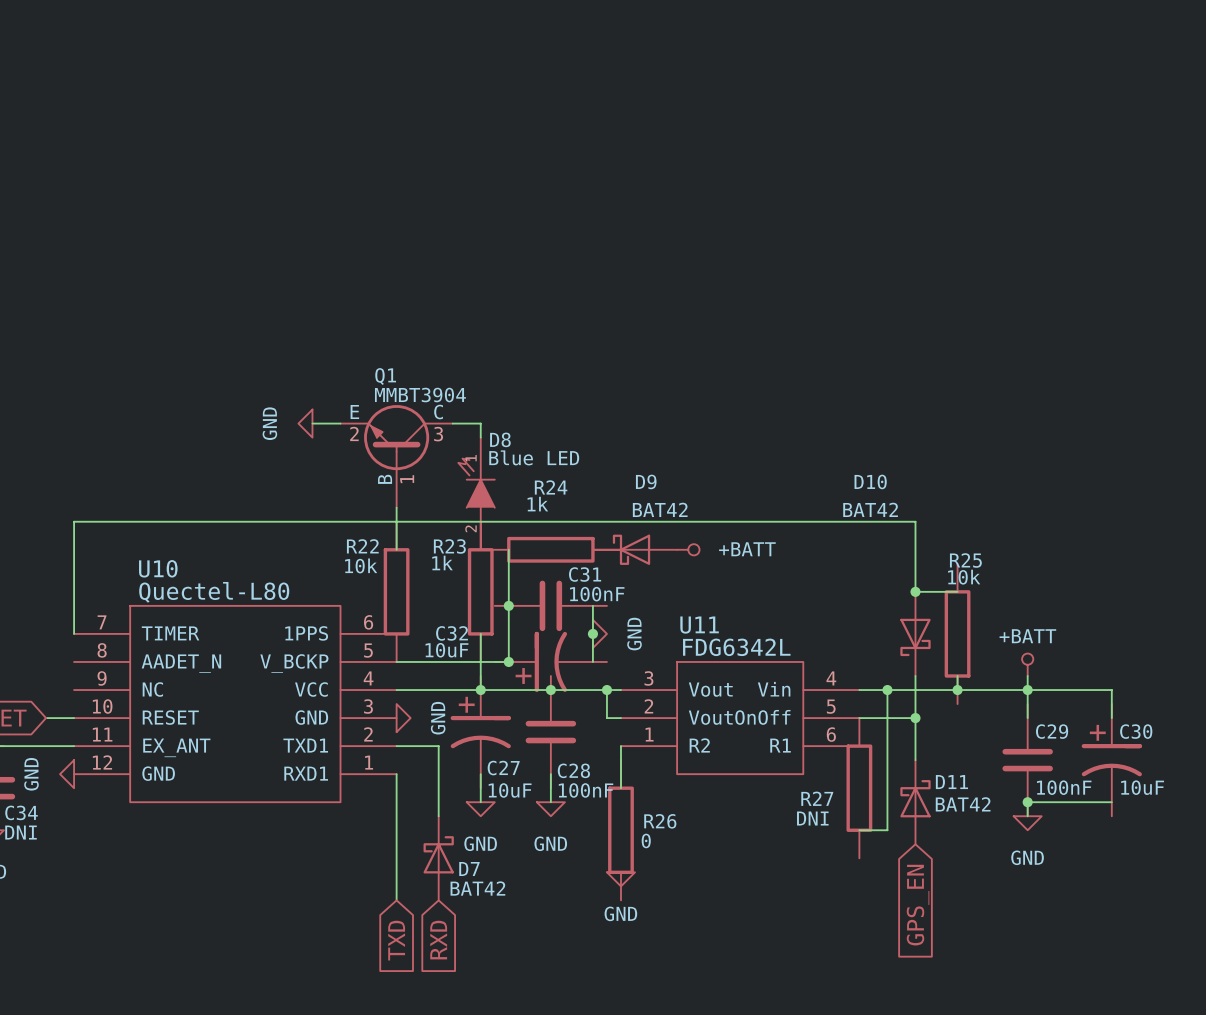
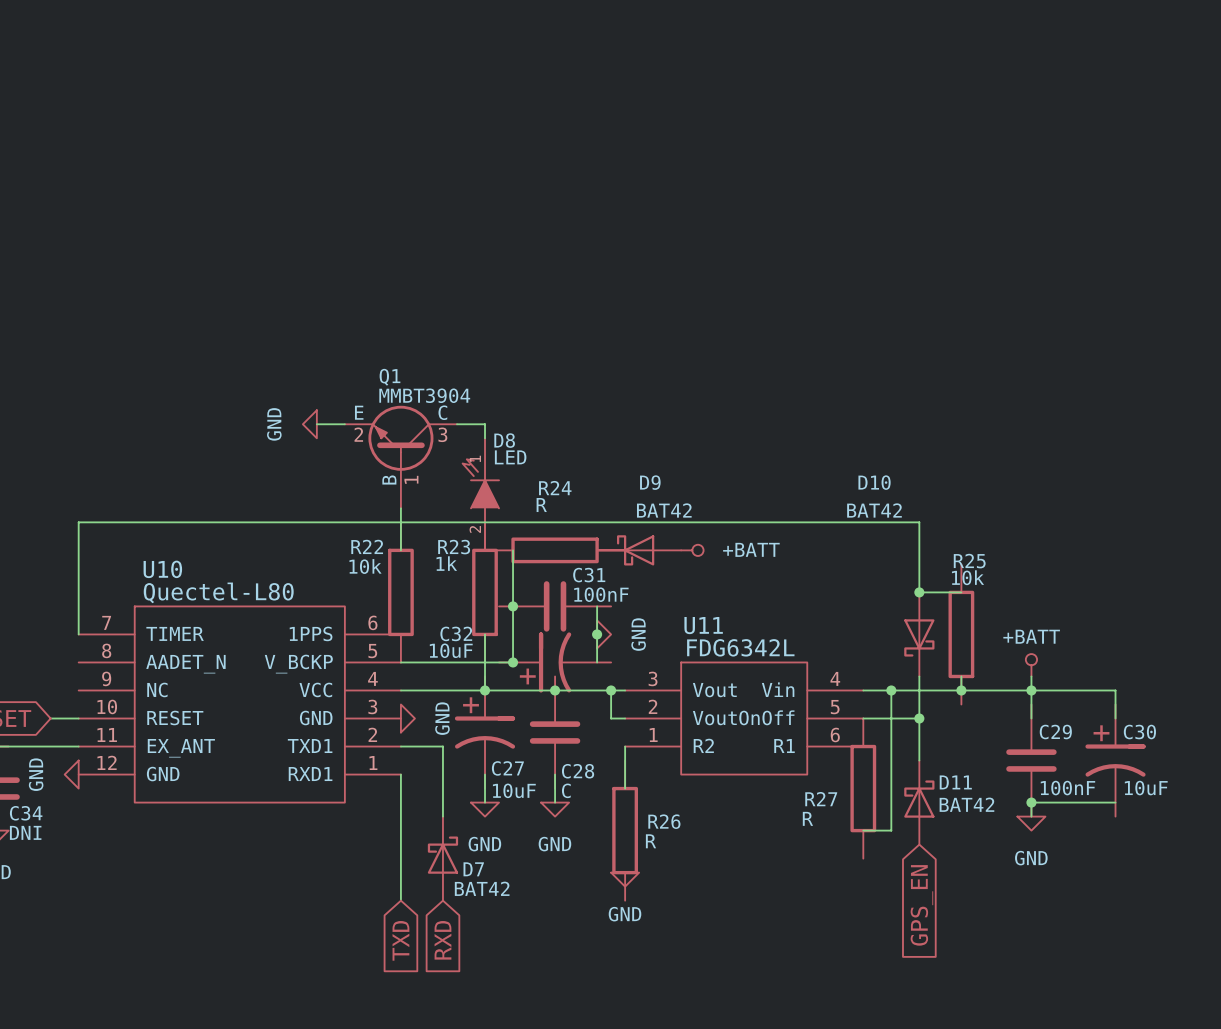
D8 value: Blue LED (534, 457) -> LED (510, 457)
R24 value: 1k (537, 504) -> R (541, 505)
C28 value: 100nF (586, 790) -> C (566, 790)
R27 value: DNI (812, 818) -> R (807, 818)
R26 value: 0 (646, 840) -> R (651, 841)

